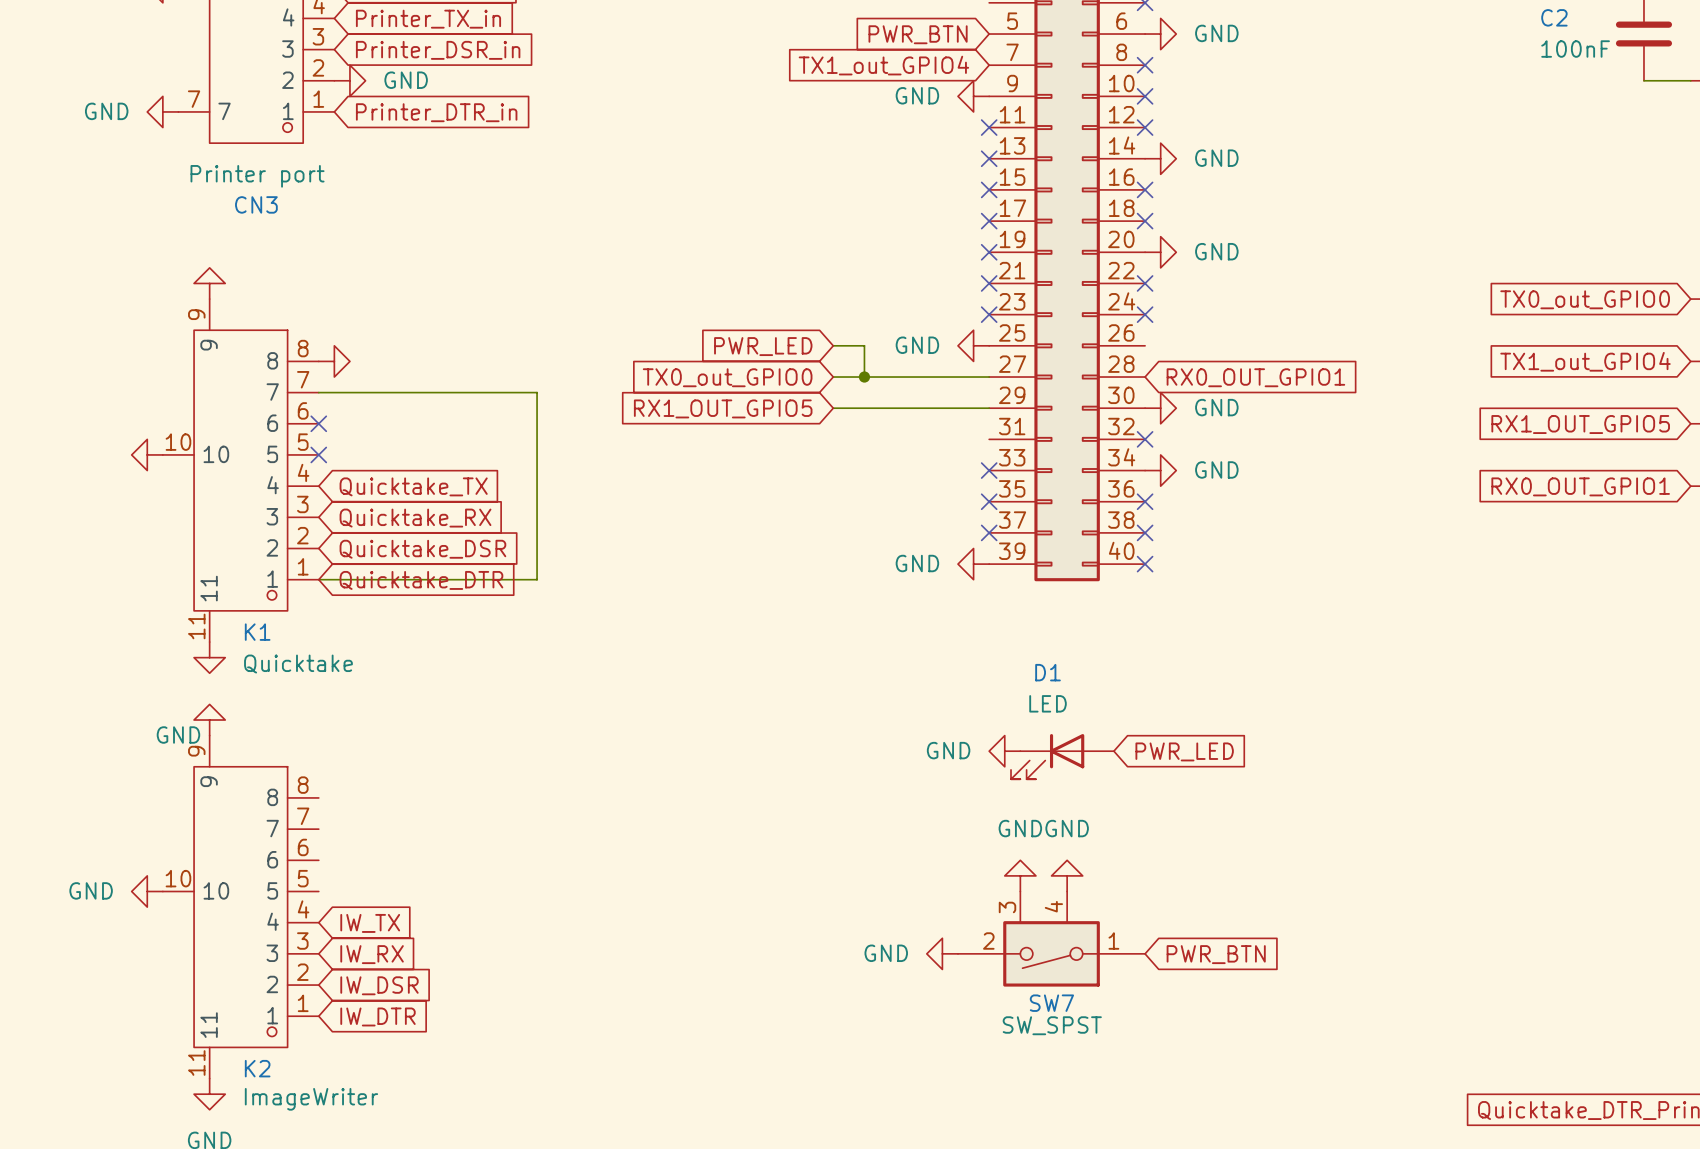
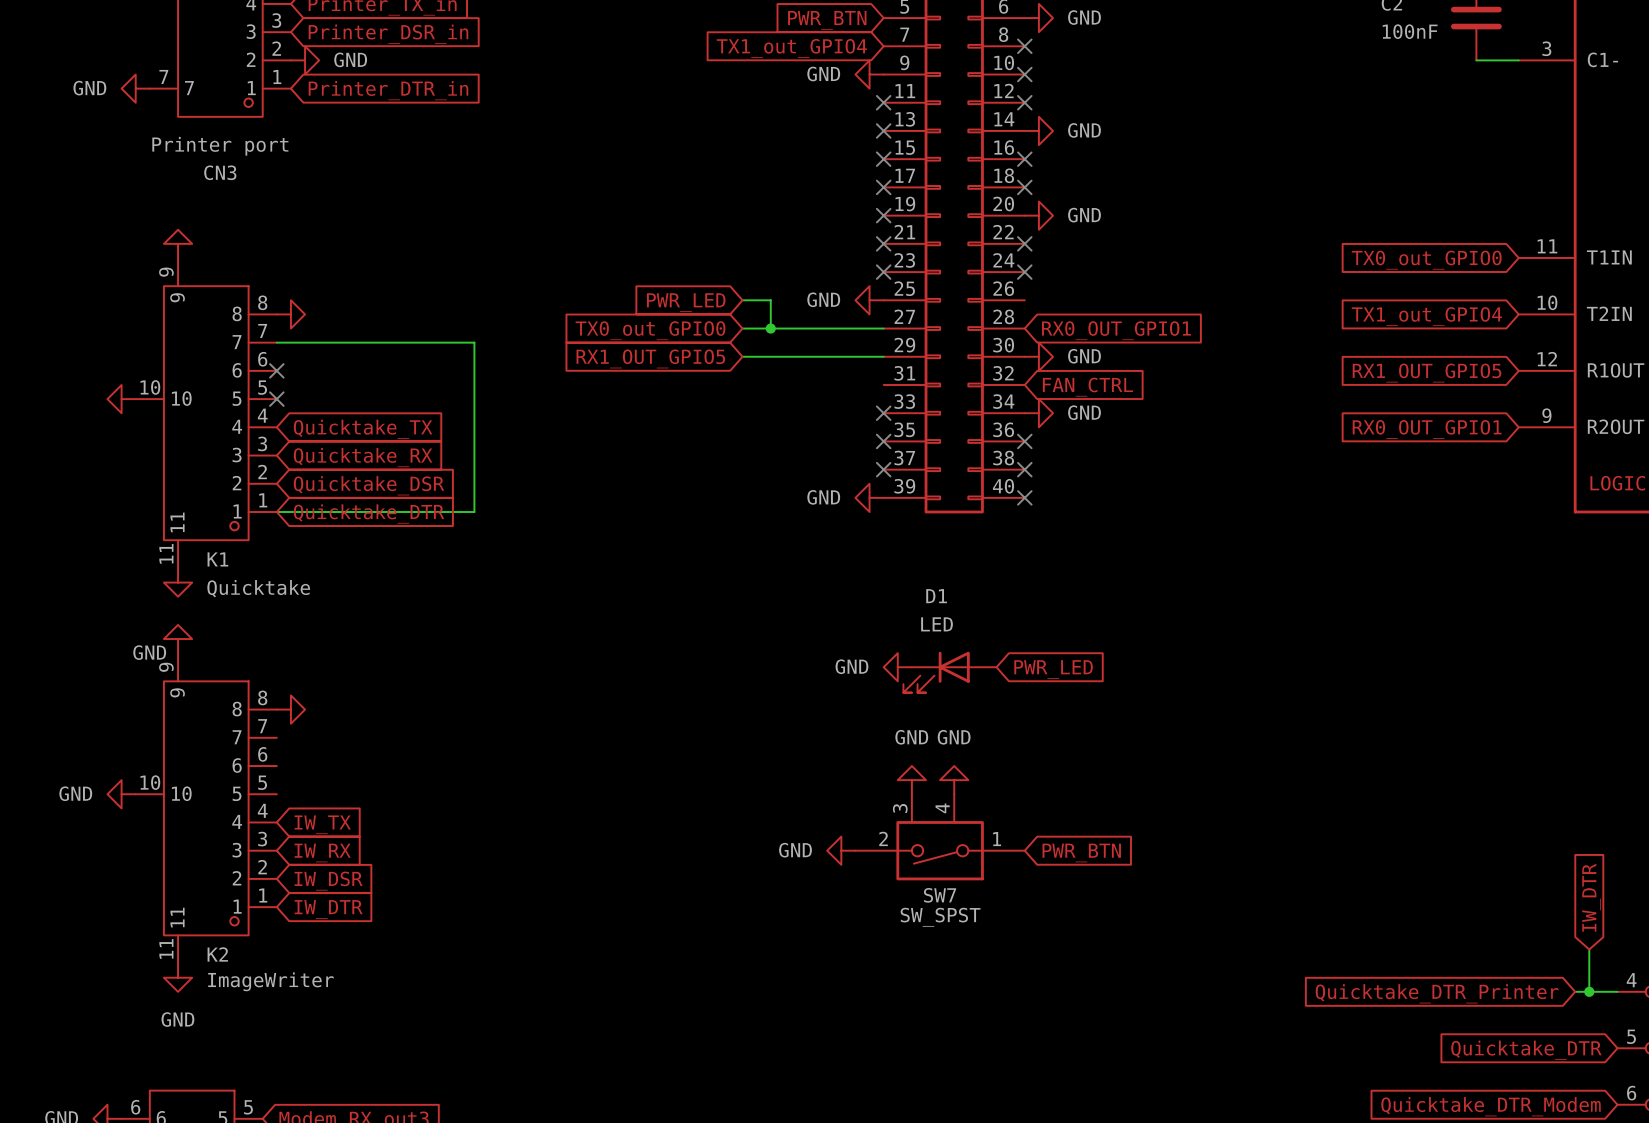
no-connect mark: (1145, 439) -> none
global label: none -> FAN_CTRL (1087, 387)
power symbol: none -> (290, 709)

